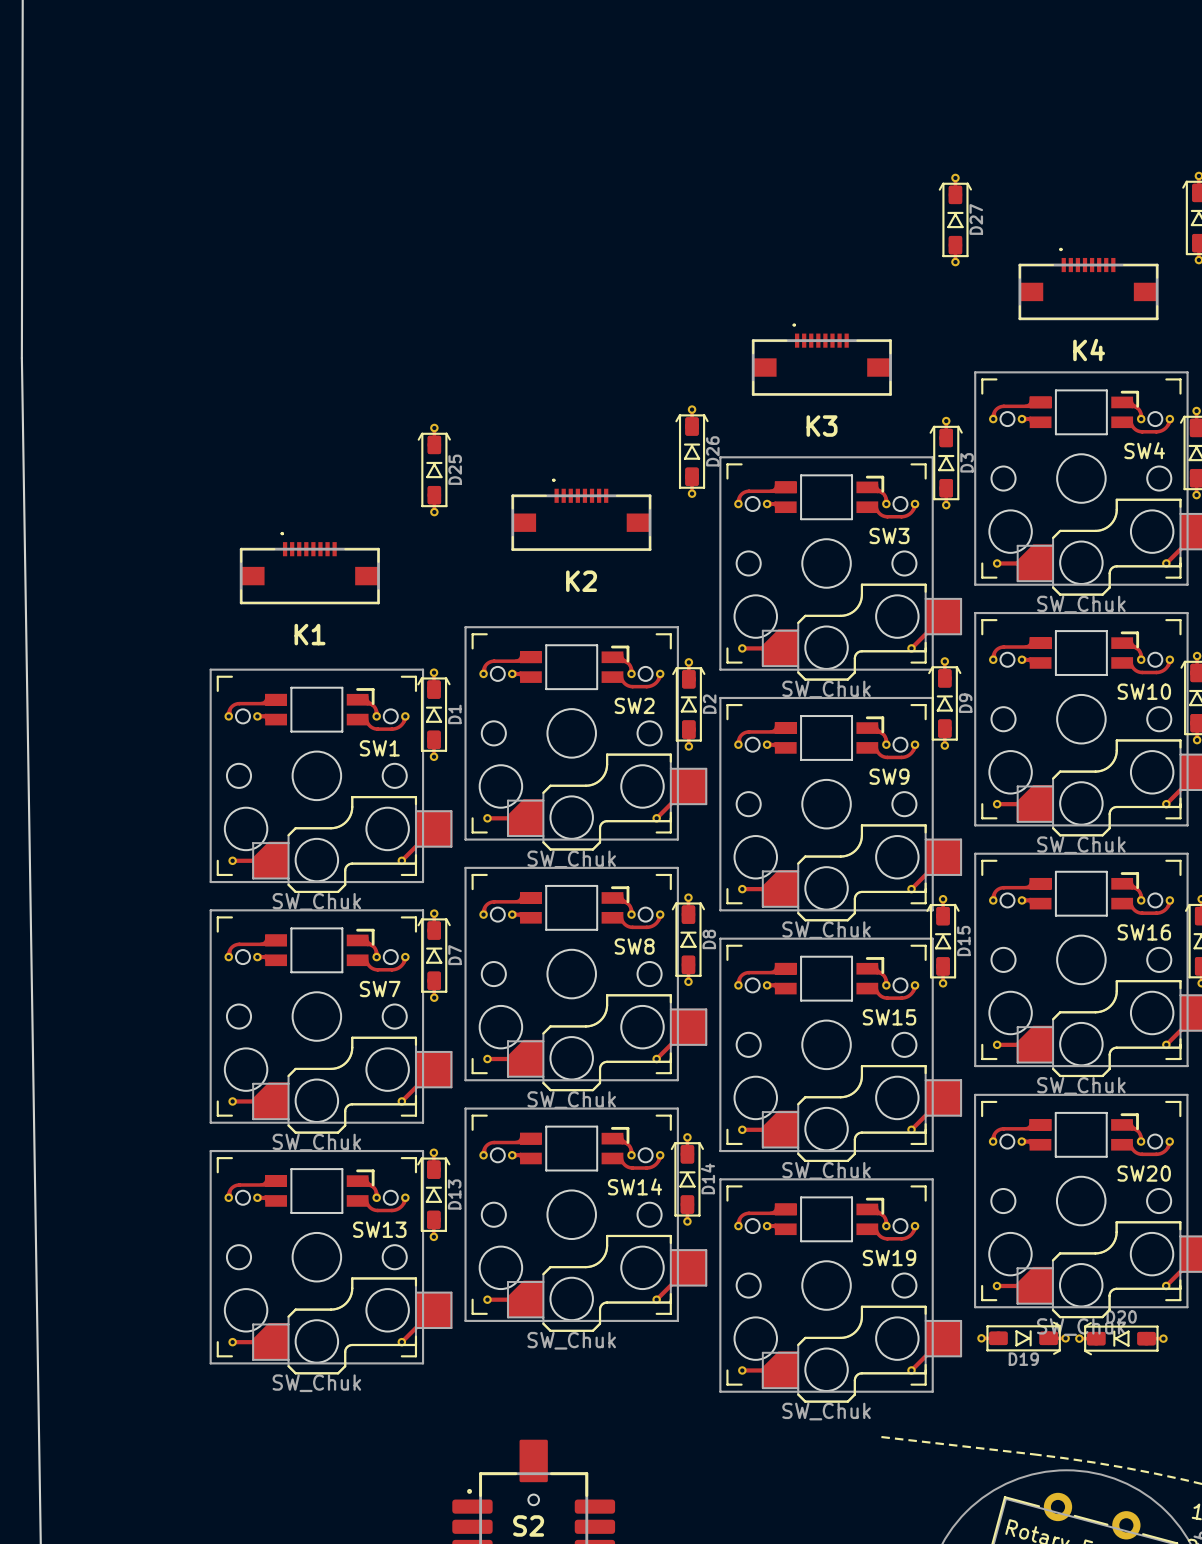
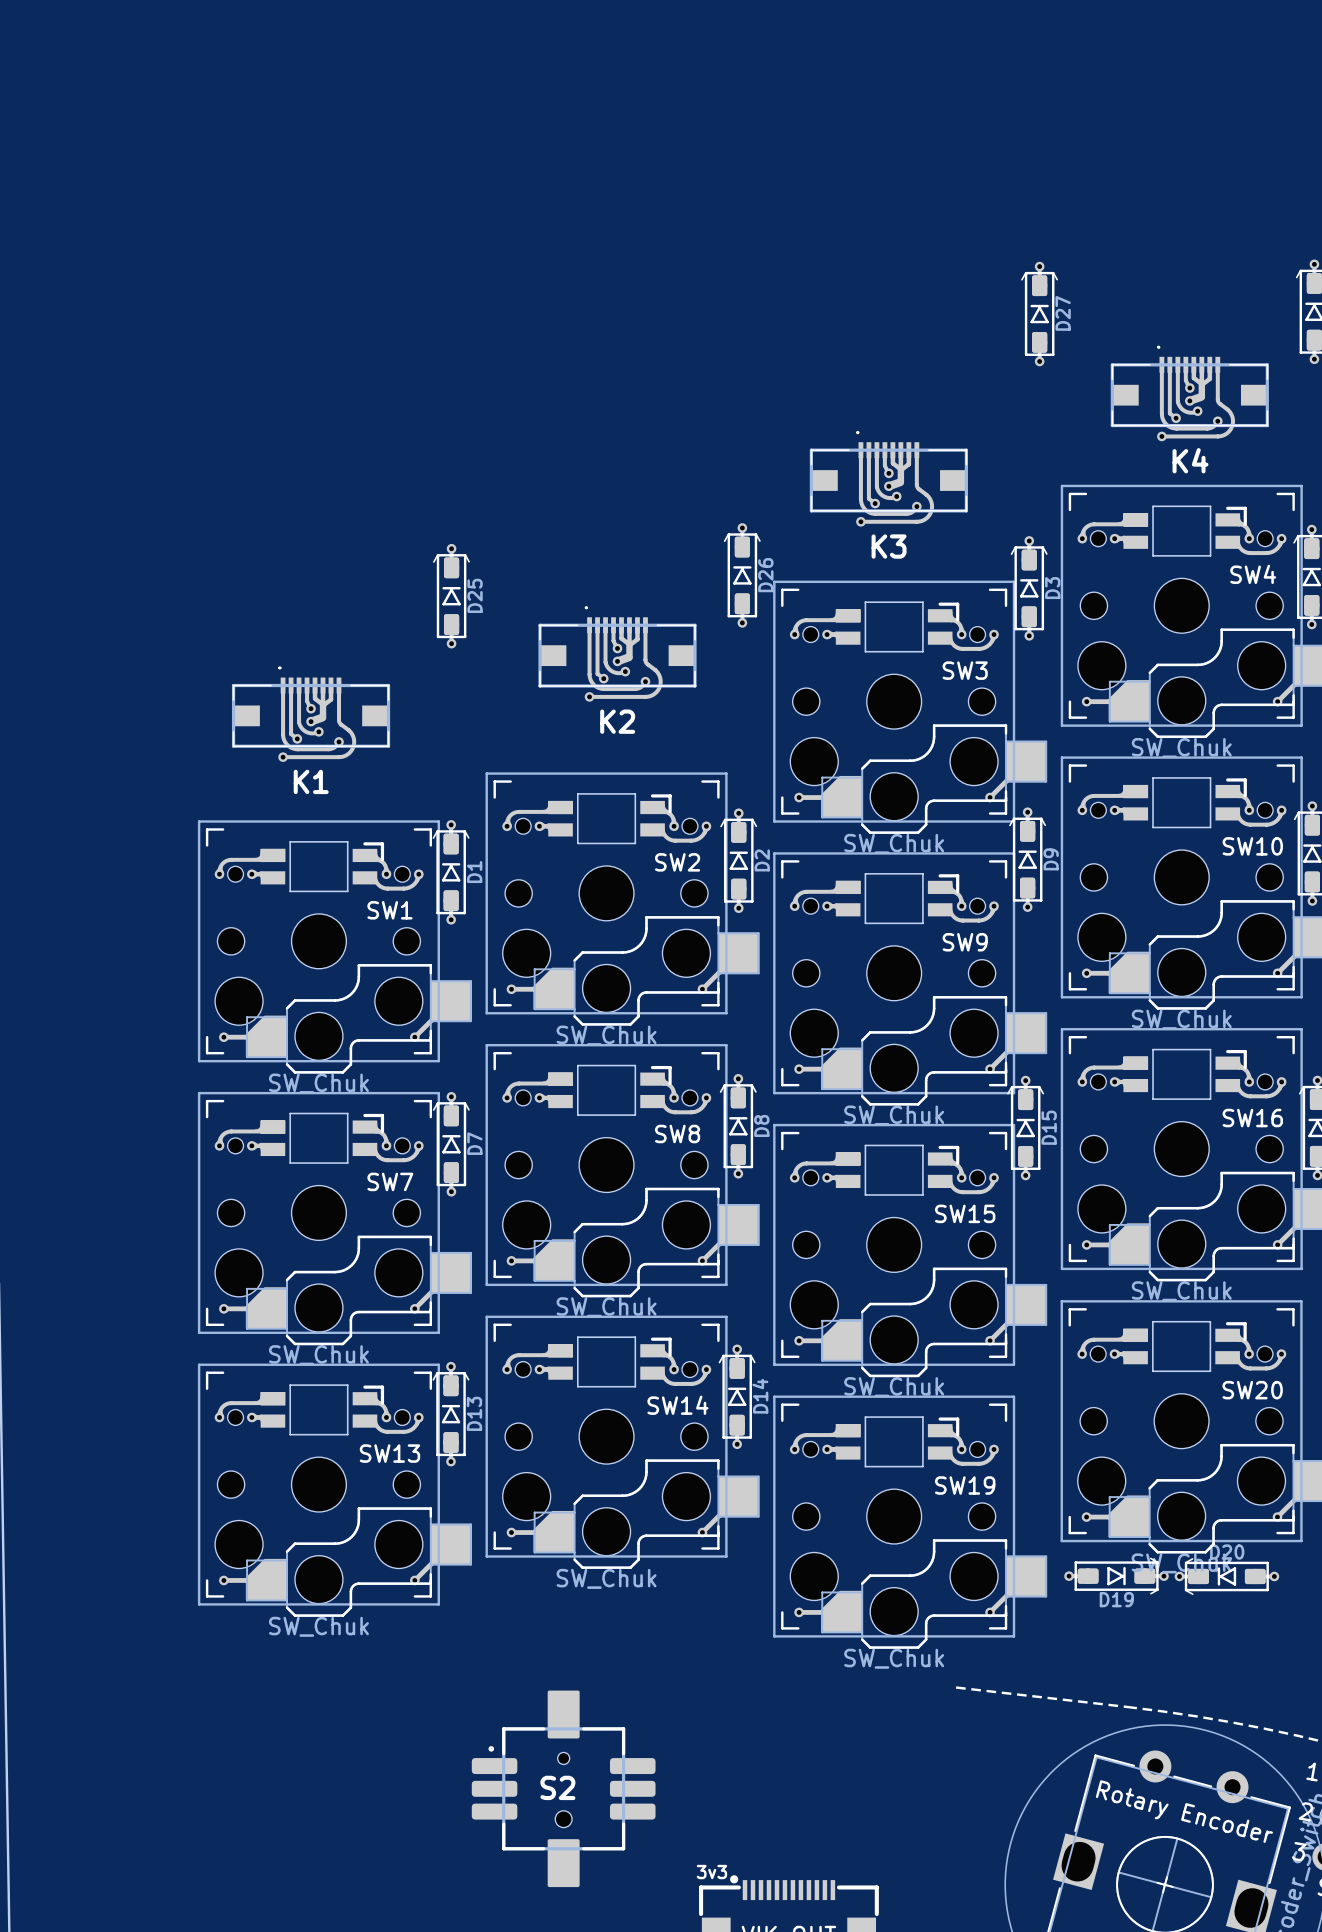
K4 footprint: [1018, 248, 1159, 321] -> [1110, 345, 1269, 442]
K3 footprint: [751, 323, 892, 396] -> [809, 430, 968, 527]
K2 footprint: [511, 478, 652, 552] -> [538, 606, 697, 702]
K1 footprint: [239, 532, 380, 605] -> [231, 666, 391, 762]

